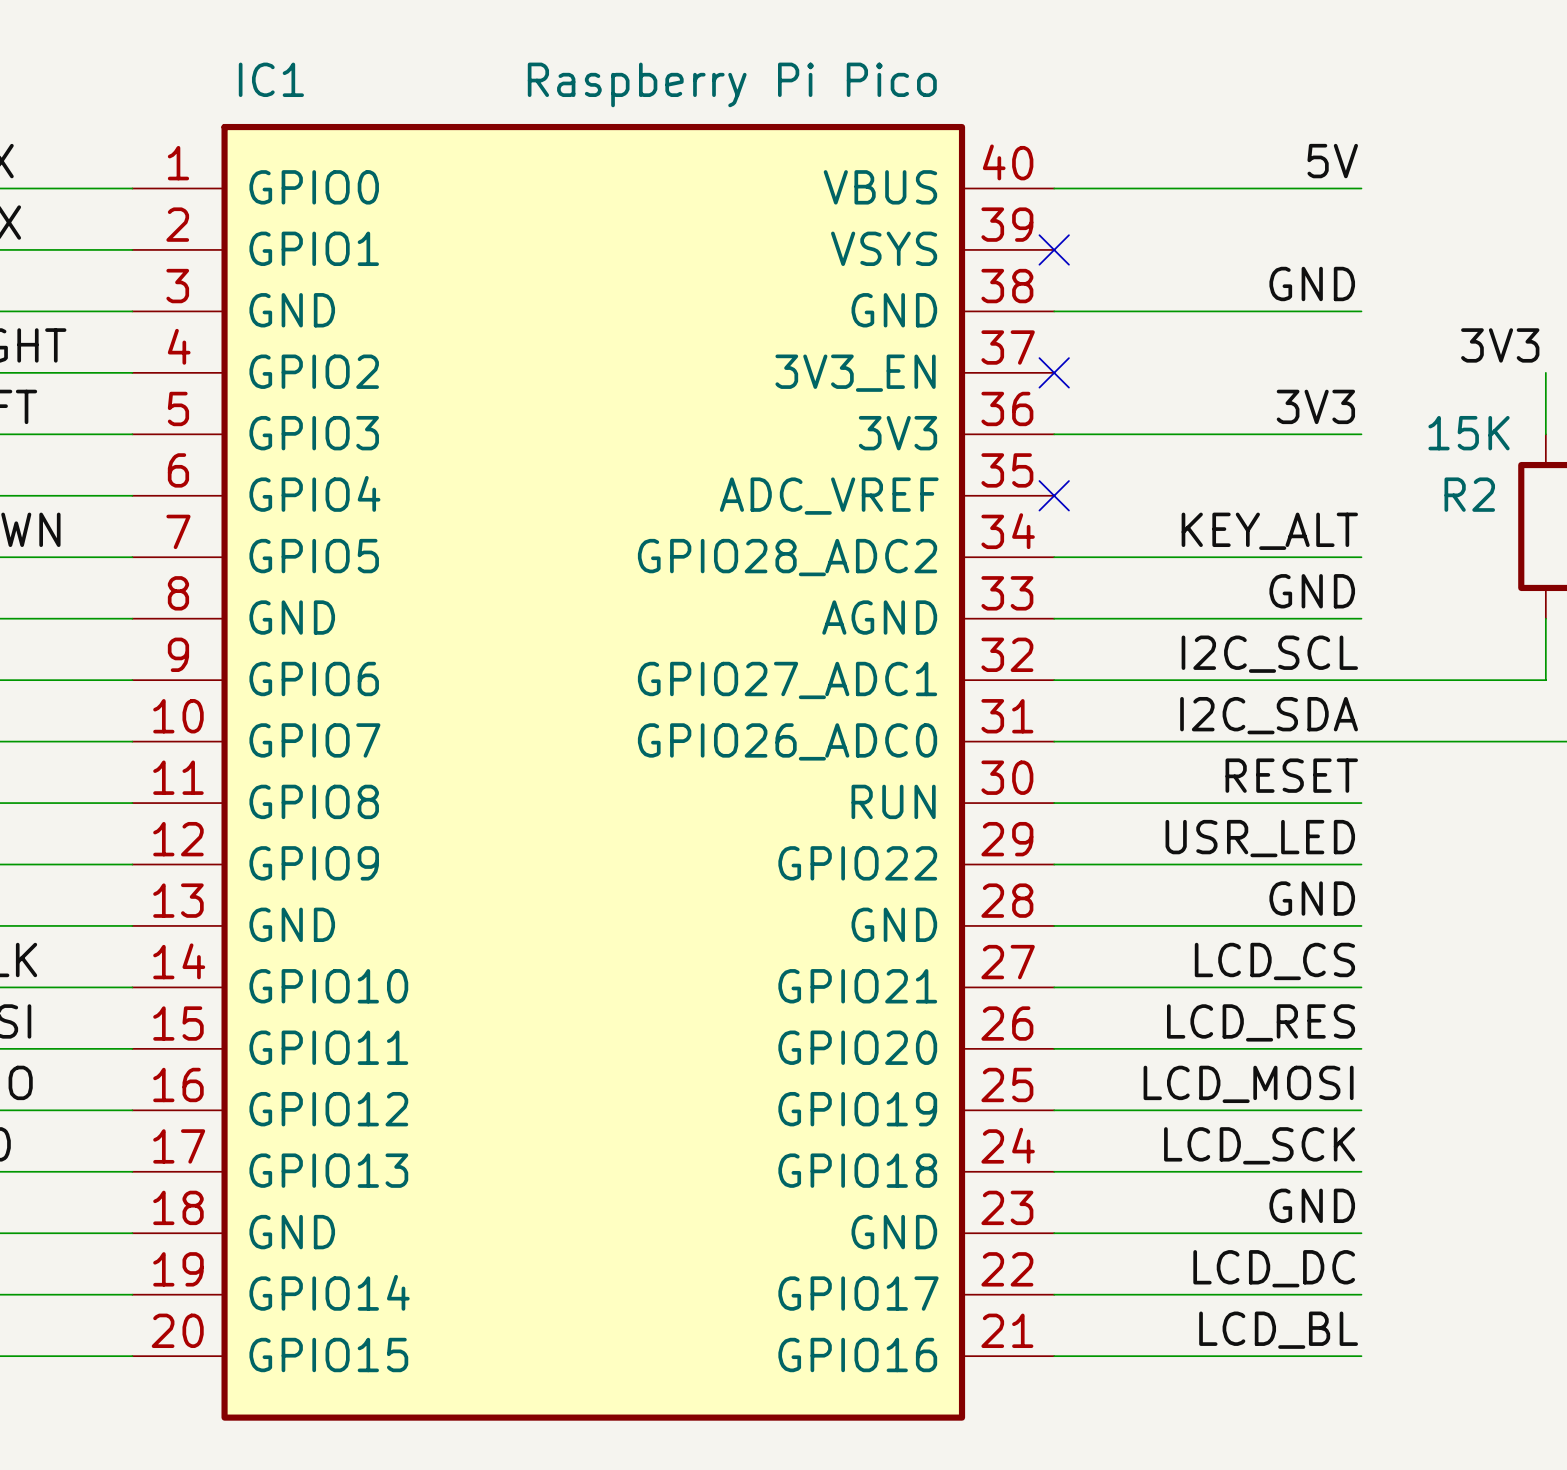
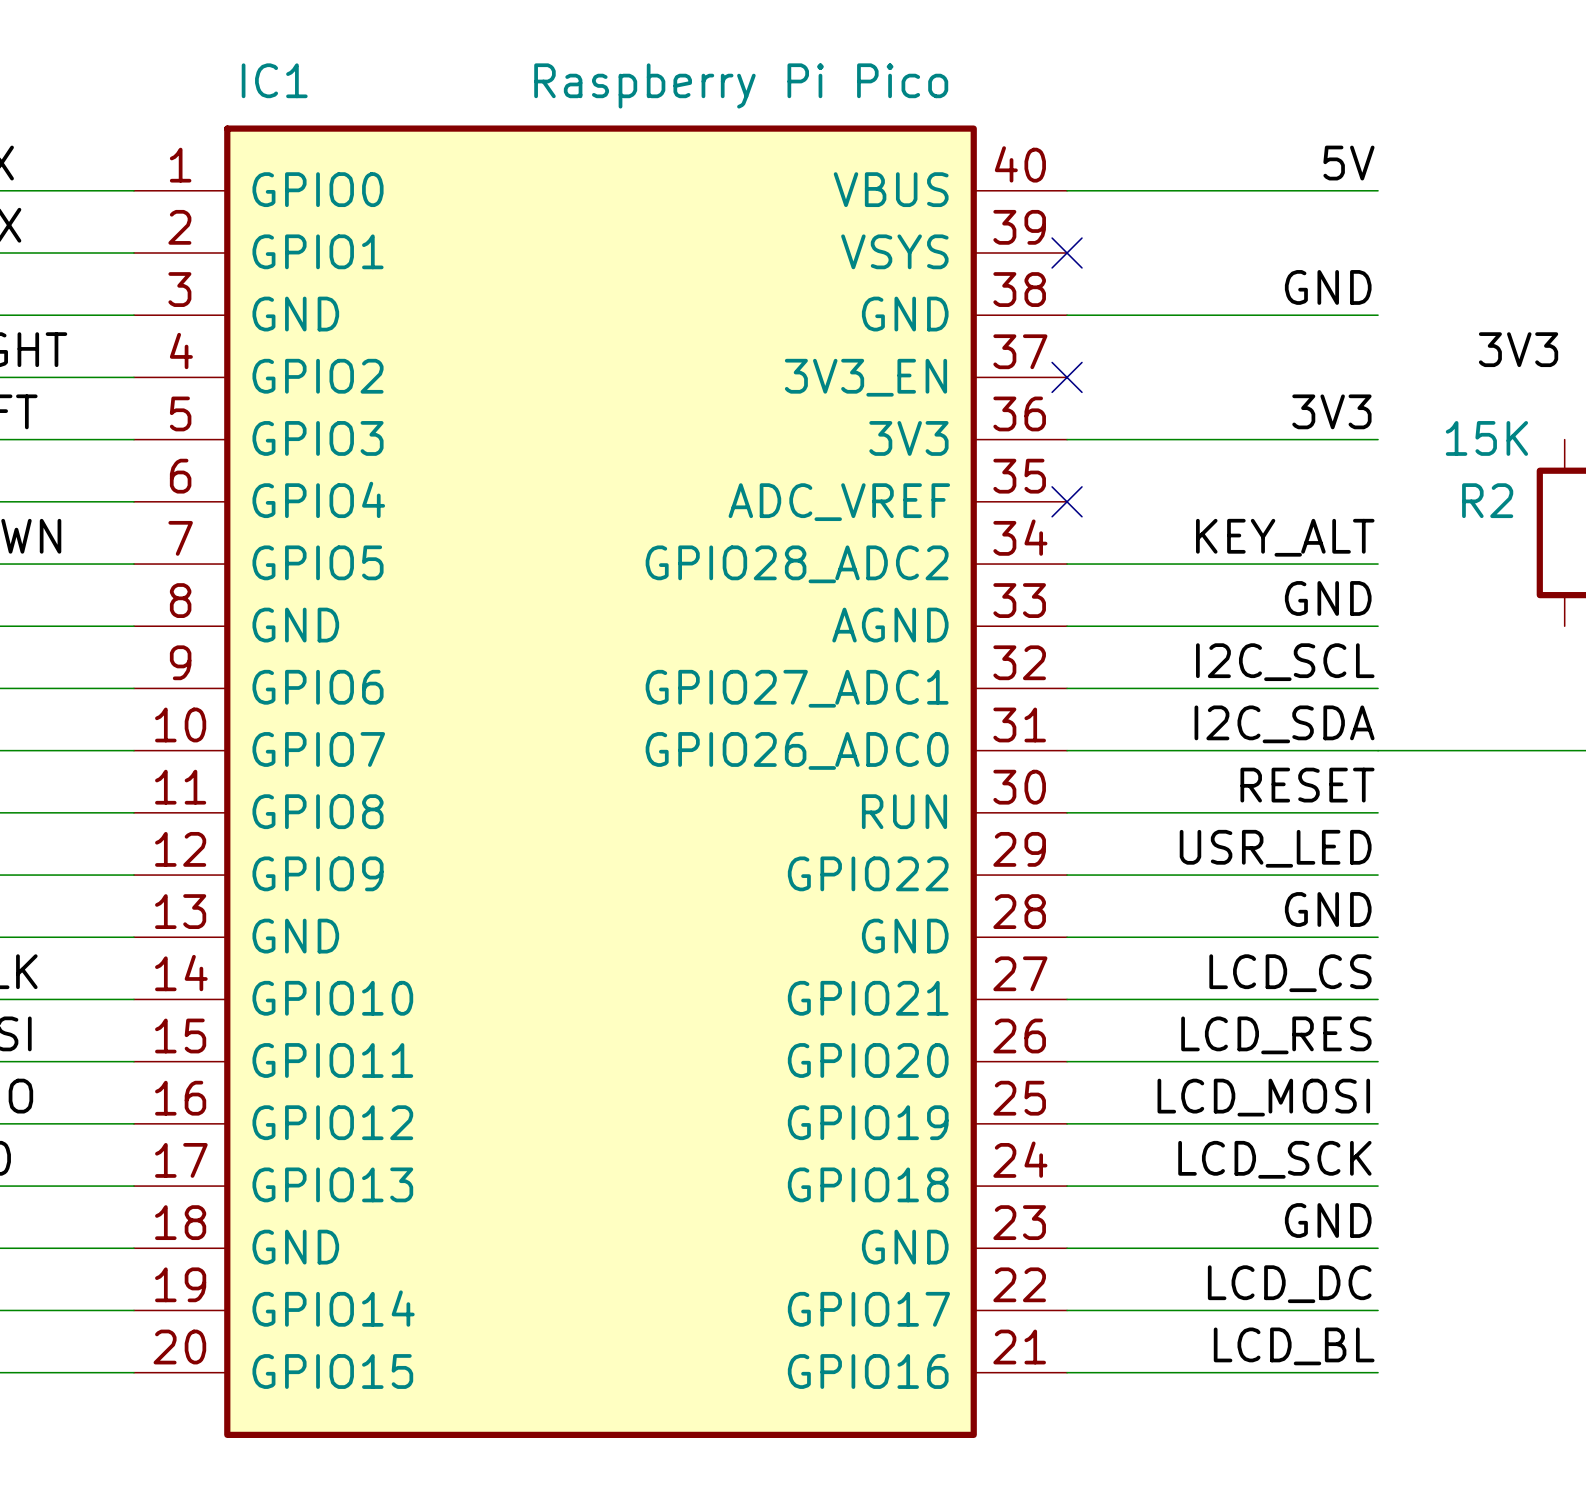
wire: (1545, 372) (1545, 434) -> none
wire: (1545, 618) (1545, 680) (1361, 680) -> none

